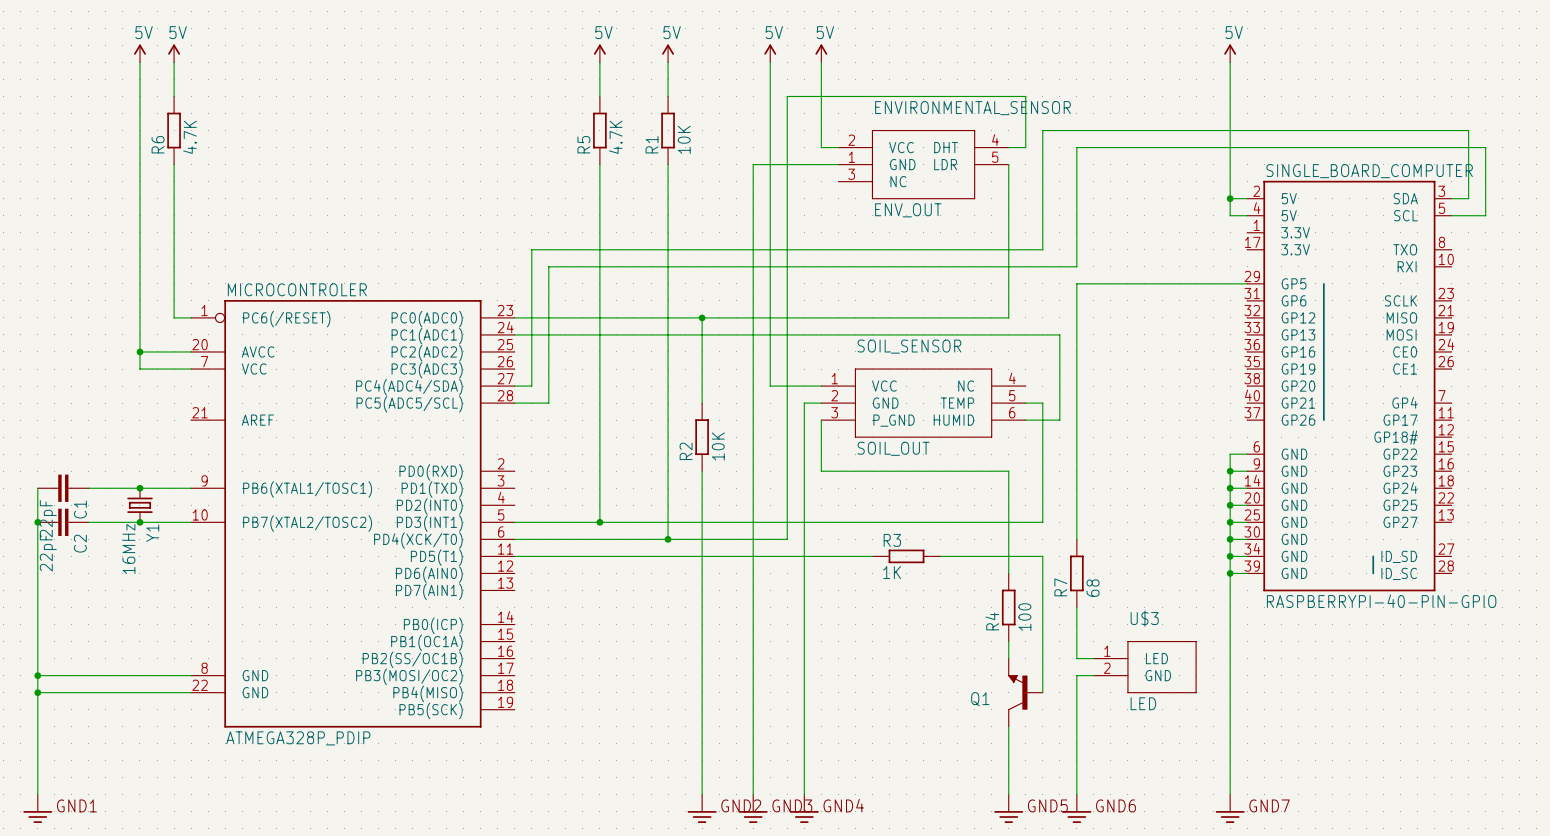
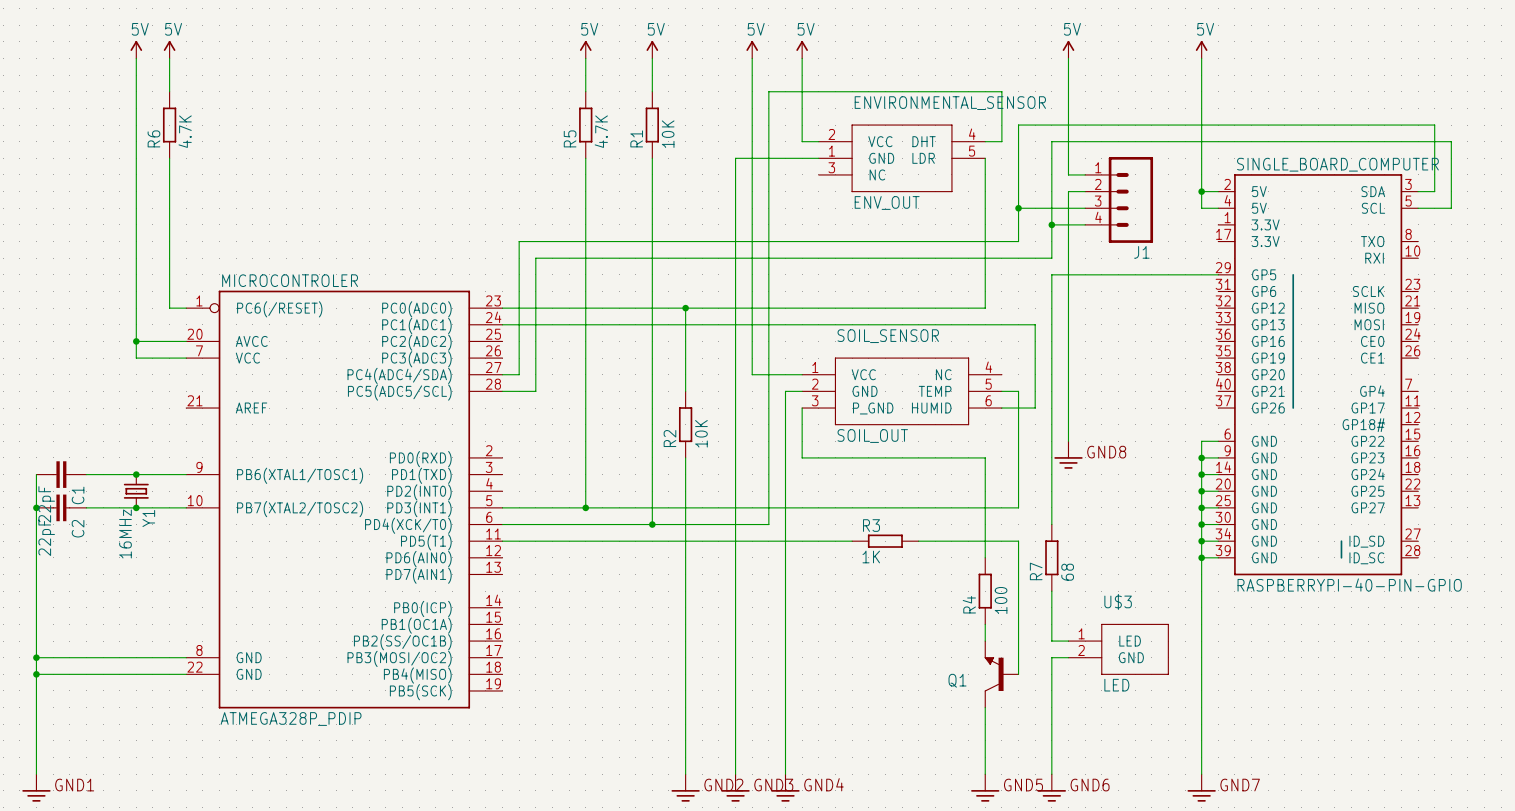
power symbol: none -> 5V (1068, 49)
wire: none -> (1068, 58) (1068, 174) (1085, 174)
wire: none -> (1085, 191) (1068, 191) (1068, 441)
J1: none -> (1119, 199)
wire: none -> (1018, 208) (1085, 208)
junction: none -> (1018, 208)
wire: none -> (1051, 224) (1085, 224)
junction: none -> (1051, 224)
GND8: none -> (1068, 455)

